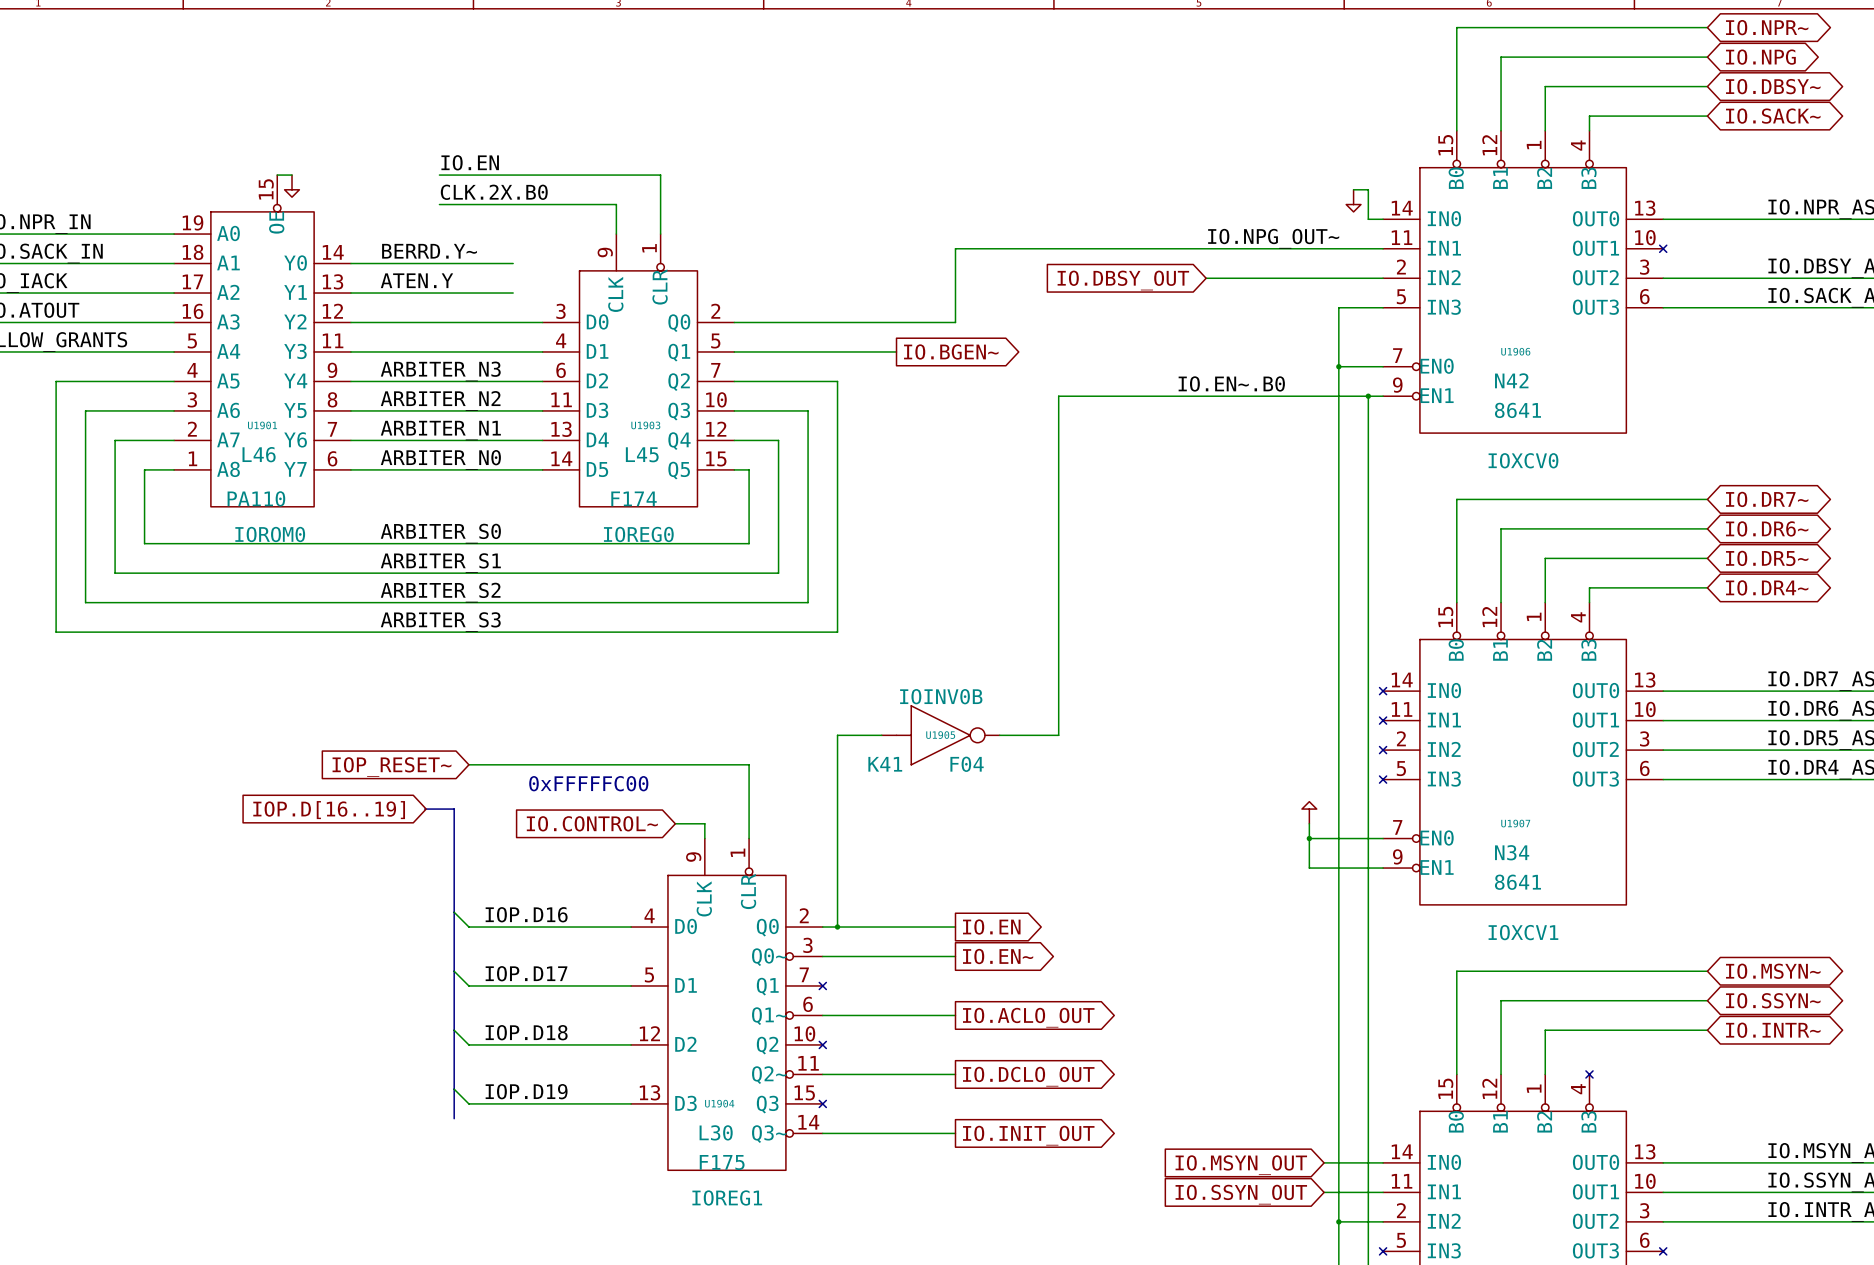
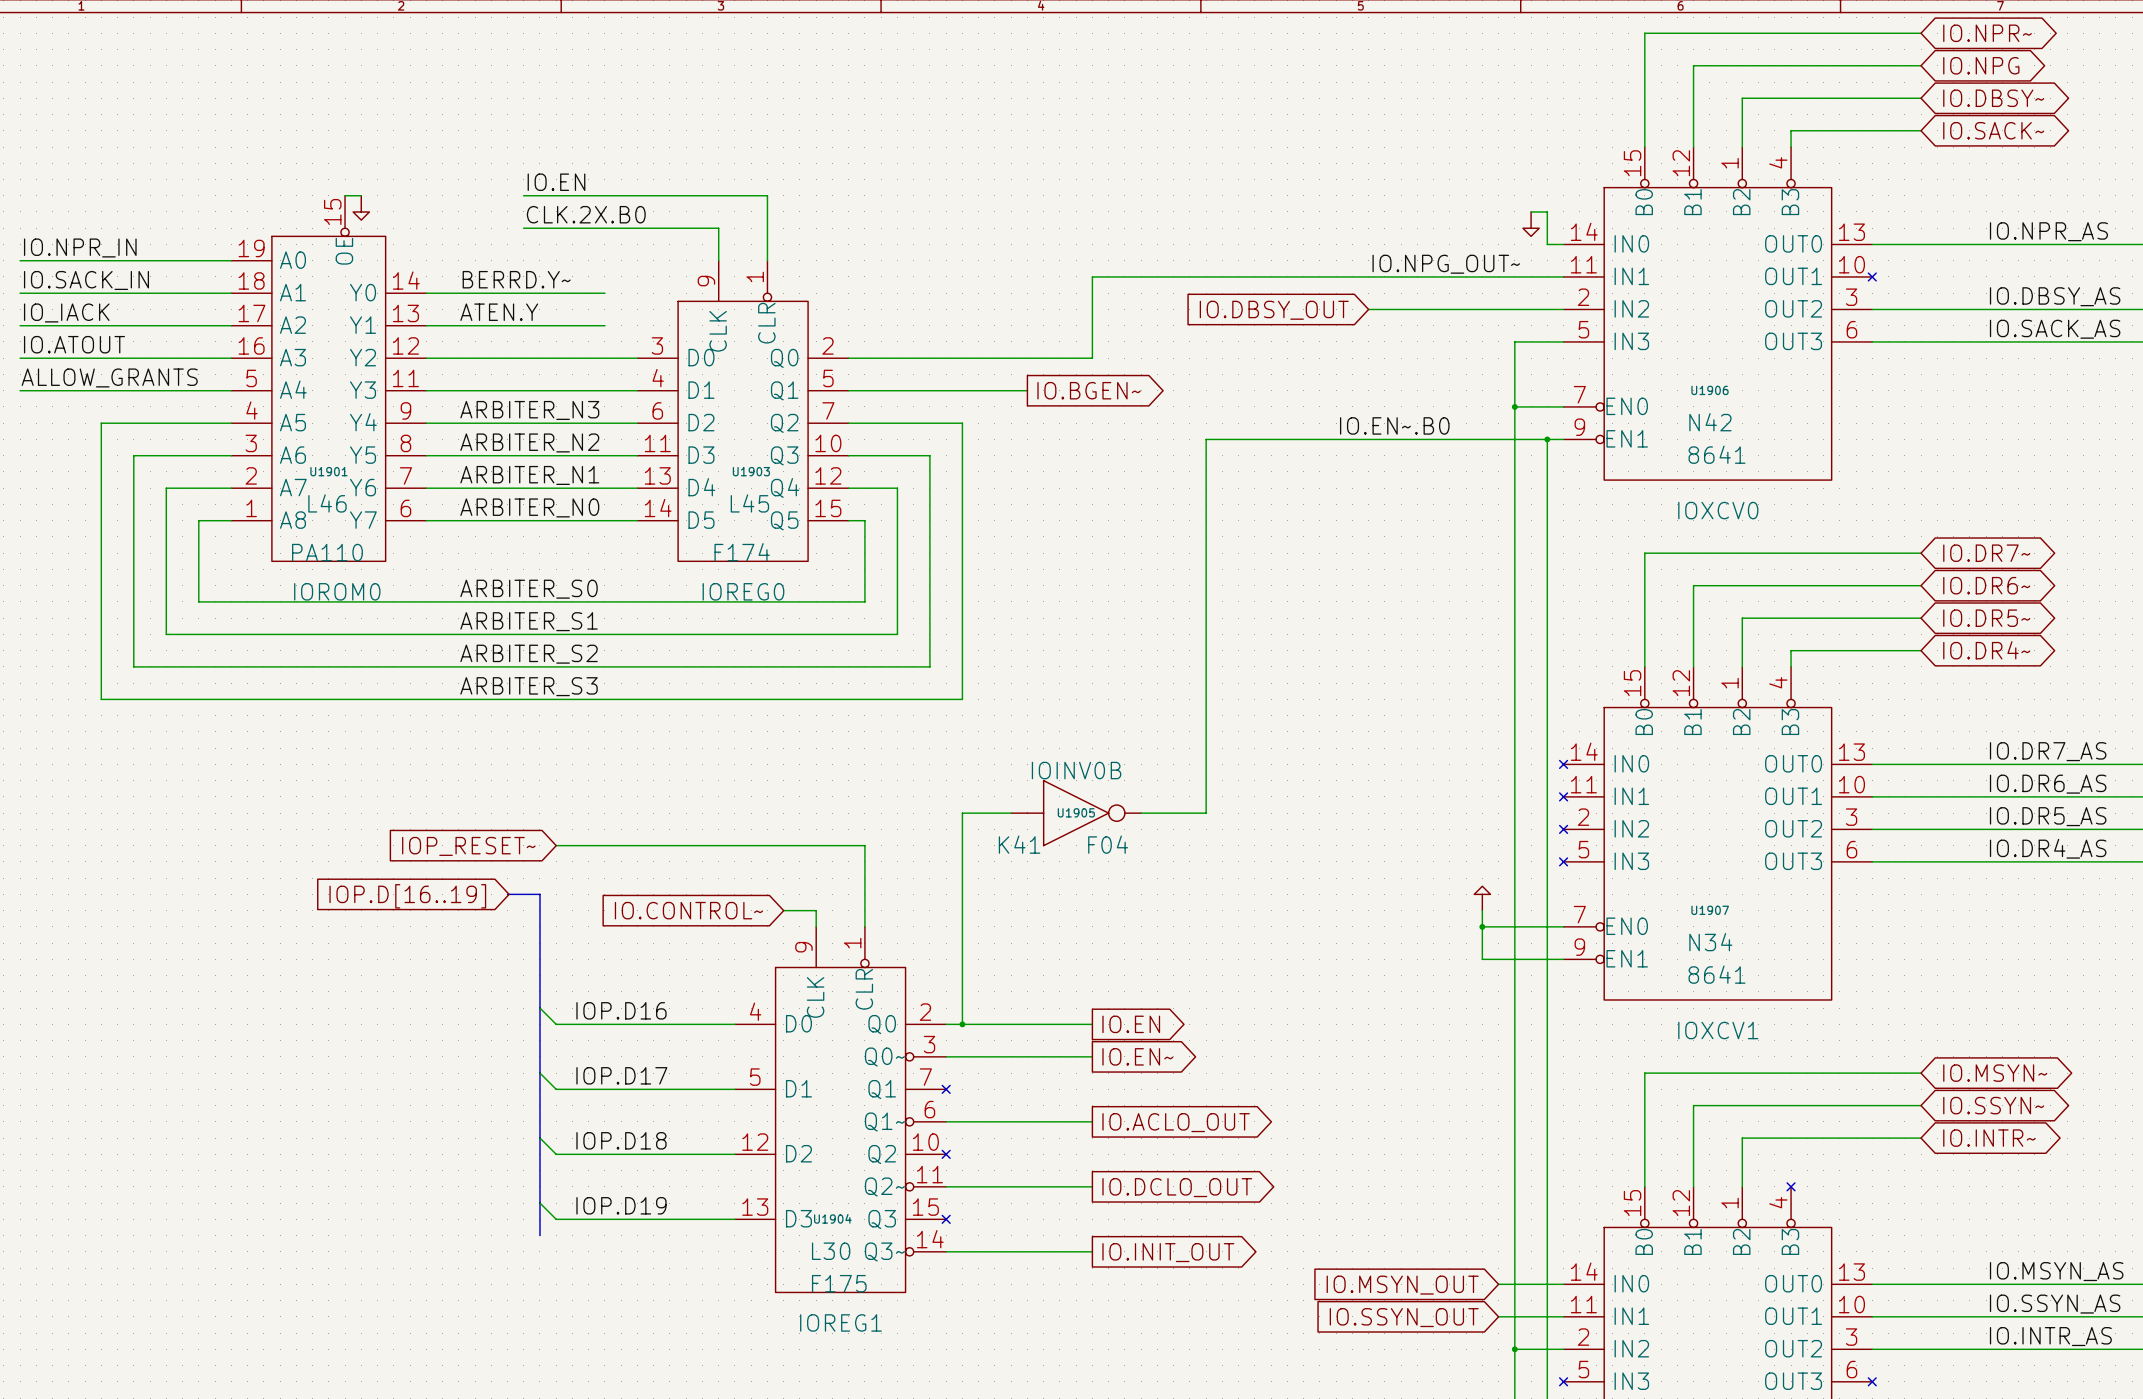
text: 0xFFFFFC00 (588, 783) -> none

